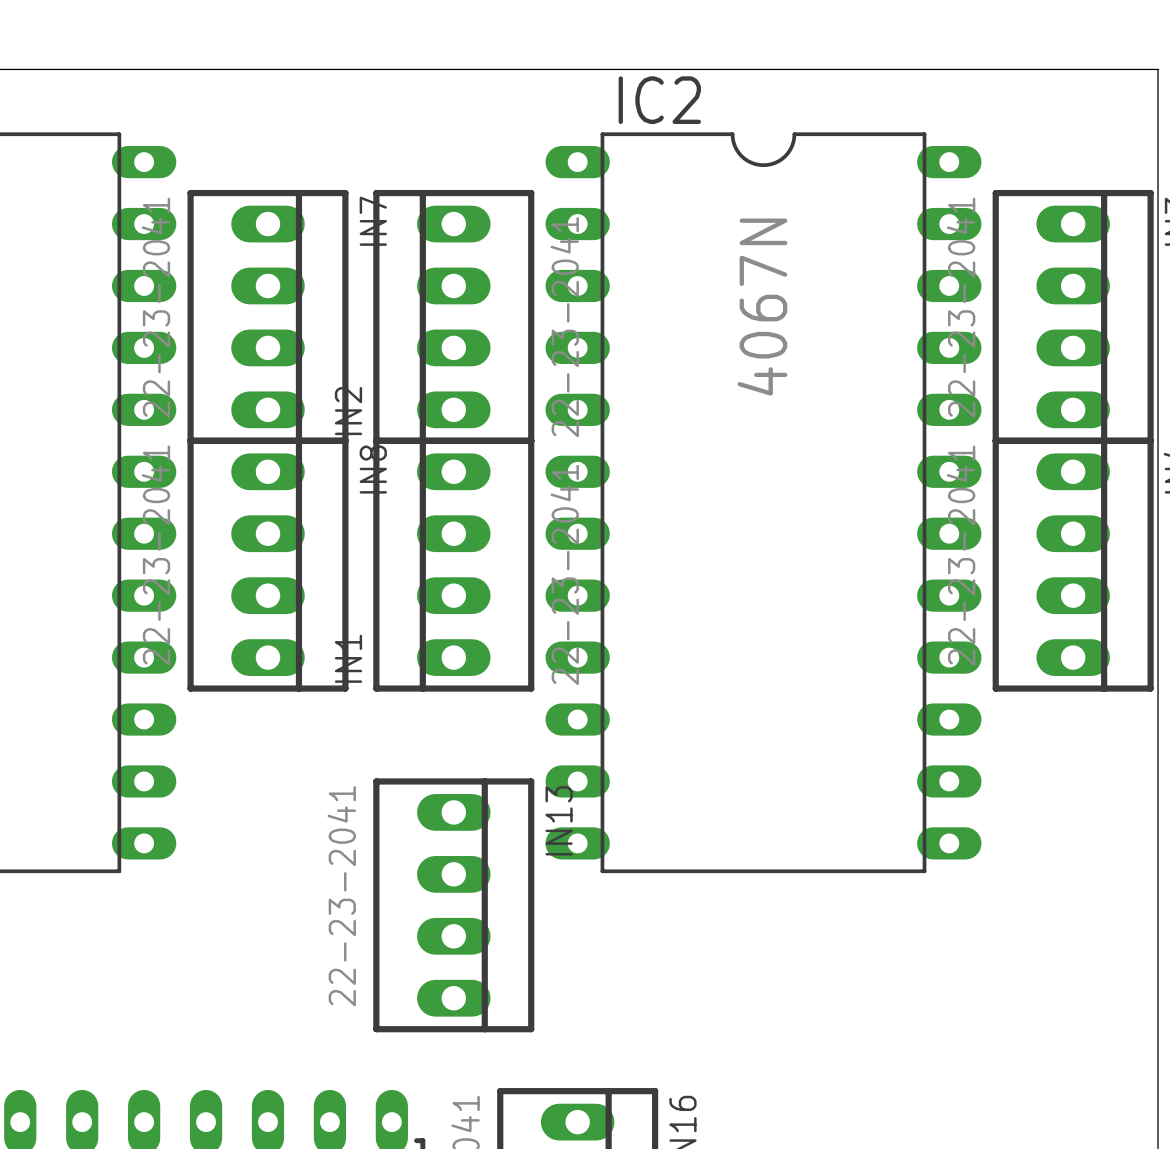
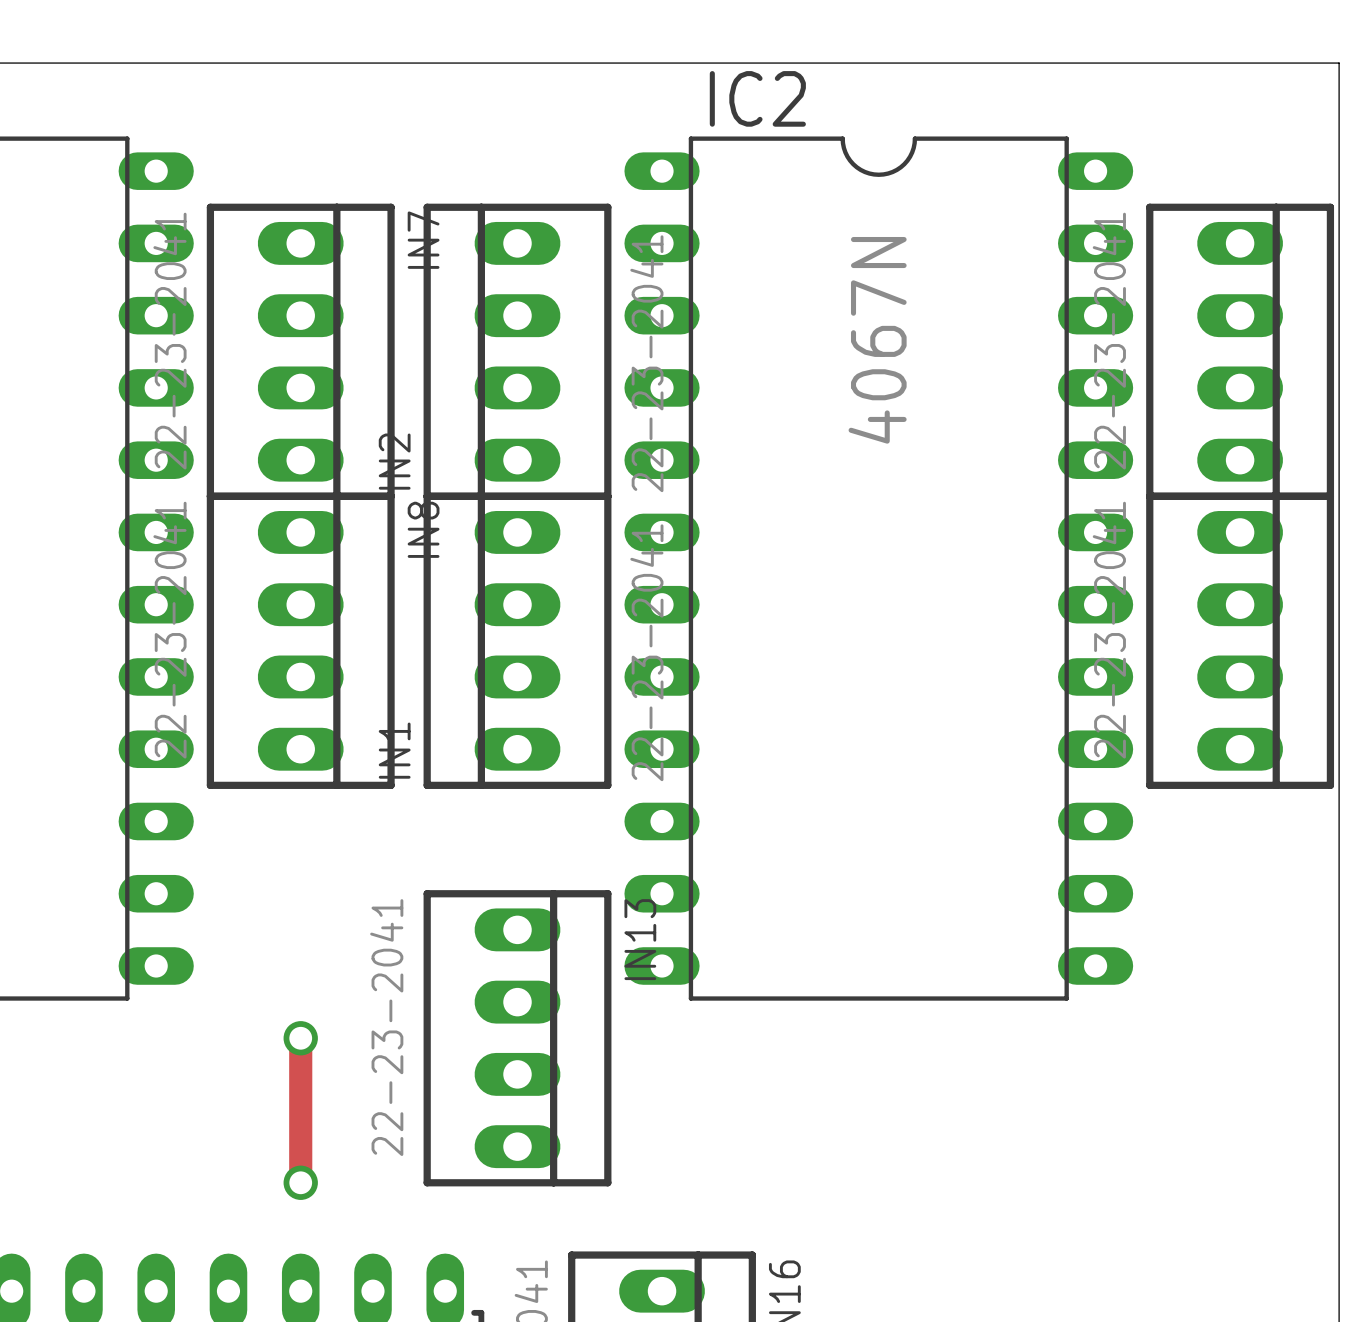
track: none -> (300, 1038) (300, 1182)
via: none -> (300, 1038)
via: none -> (300, 1182)

